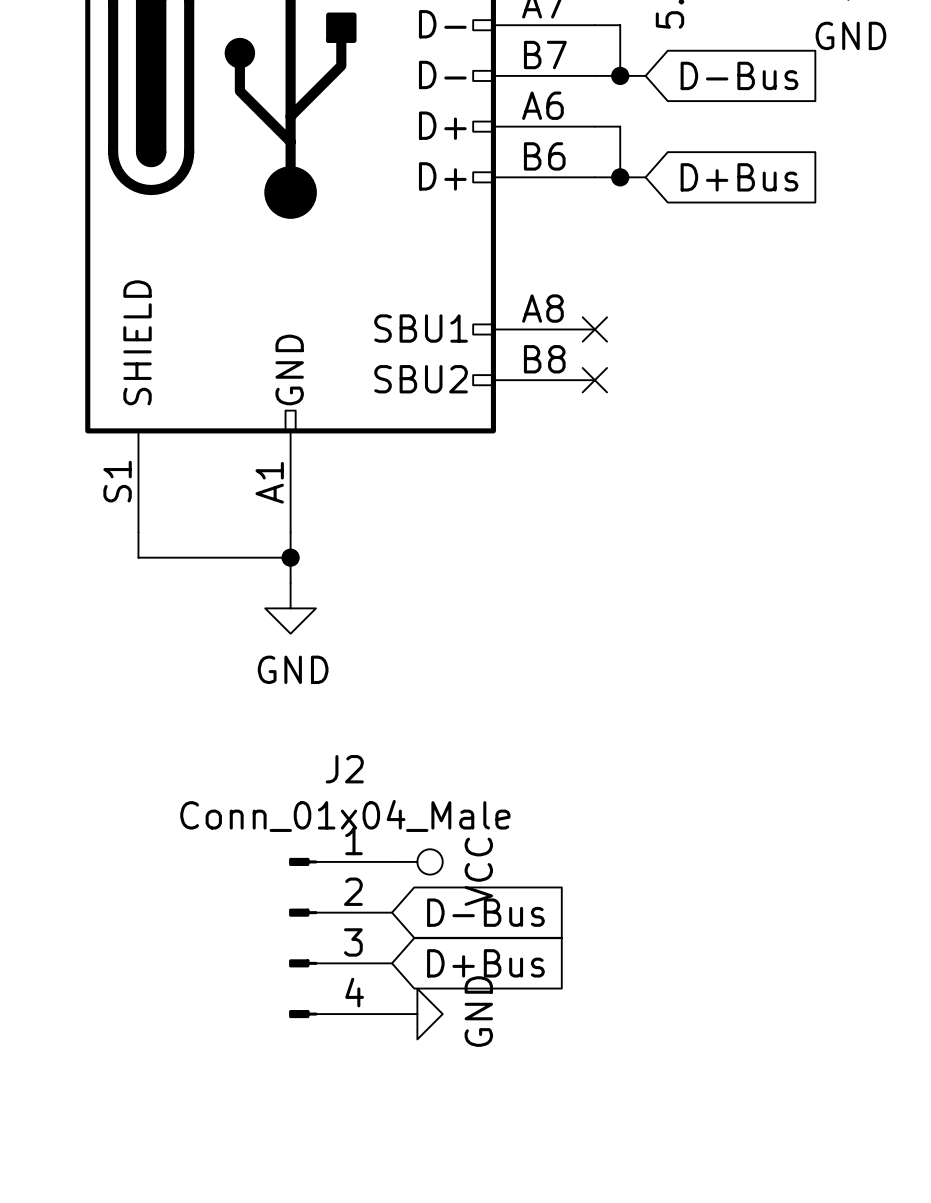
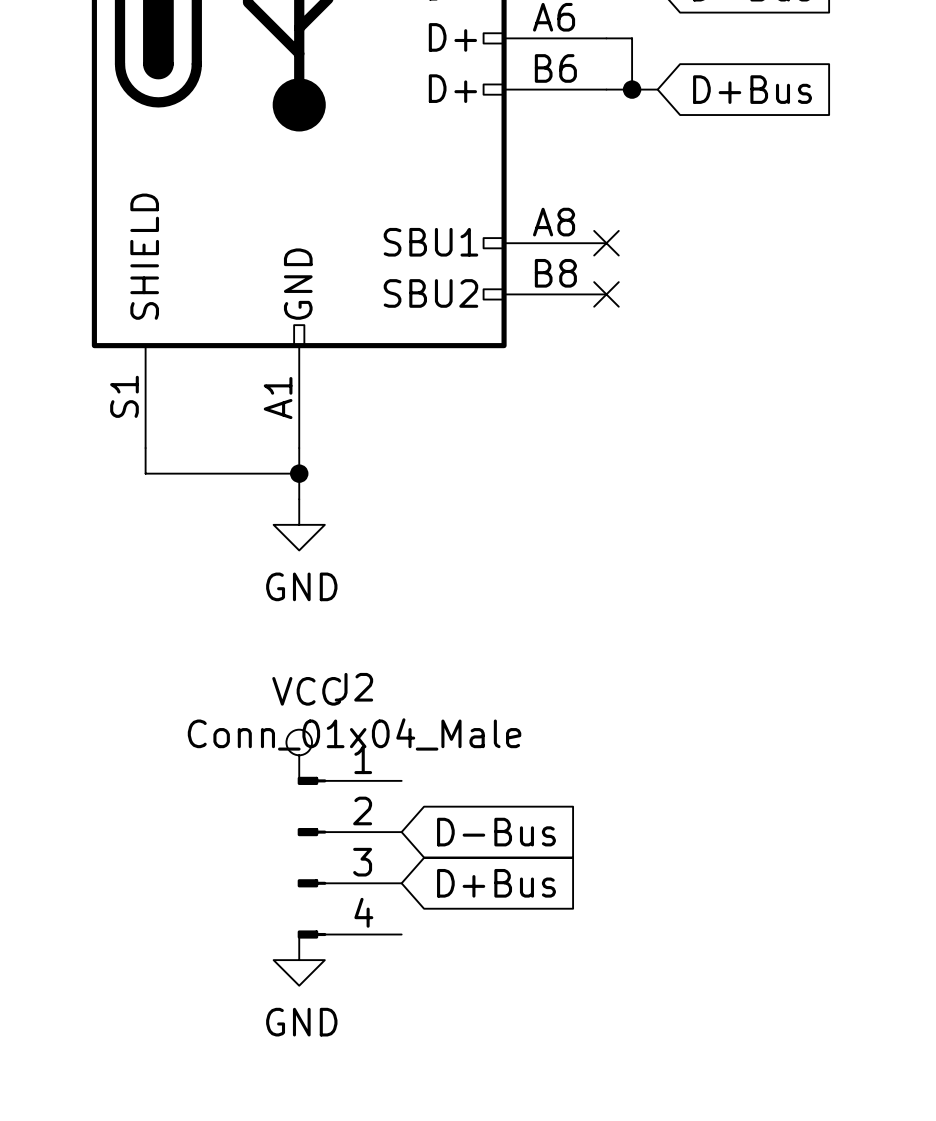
power symbol rotation: 0° (417, 861) -> 90° counterclockwise (299, 755)
power symbol position: VCC (417, 861) -> VCC (299, 755)
power symbol rotation: 0° (417, 1014) -> 90° clockwise (299, 960)
power symbol position: GND (417, 1014) -> GND (299, 960)

